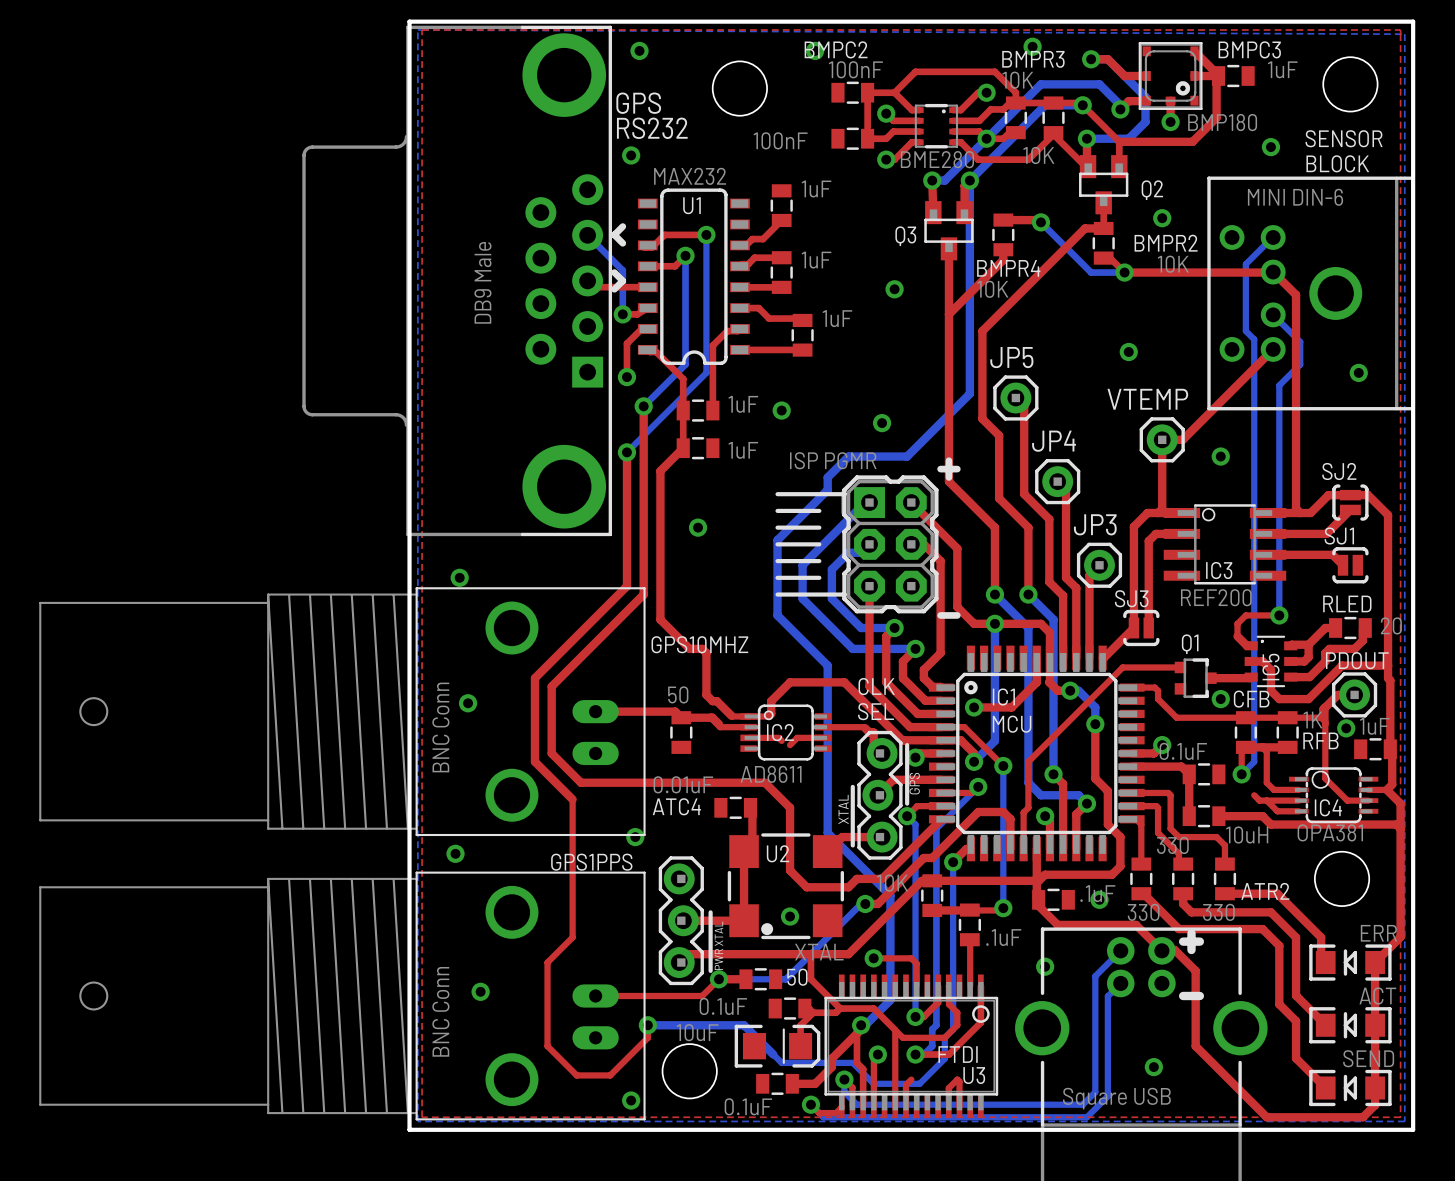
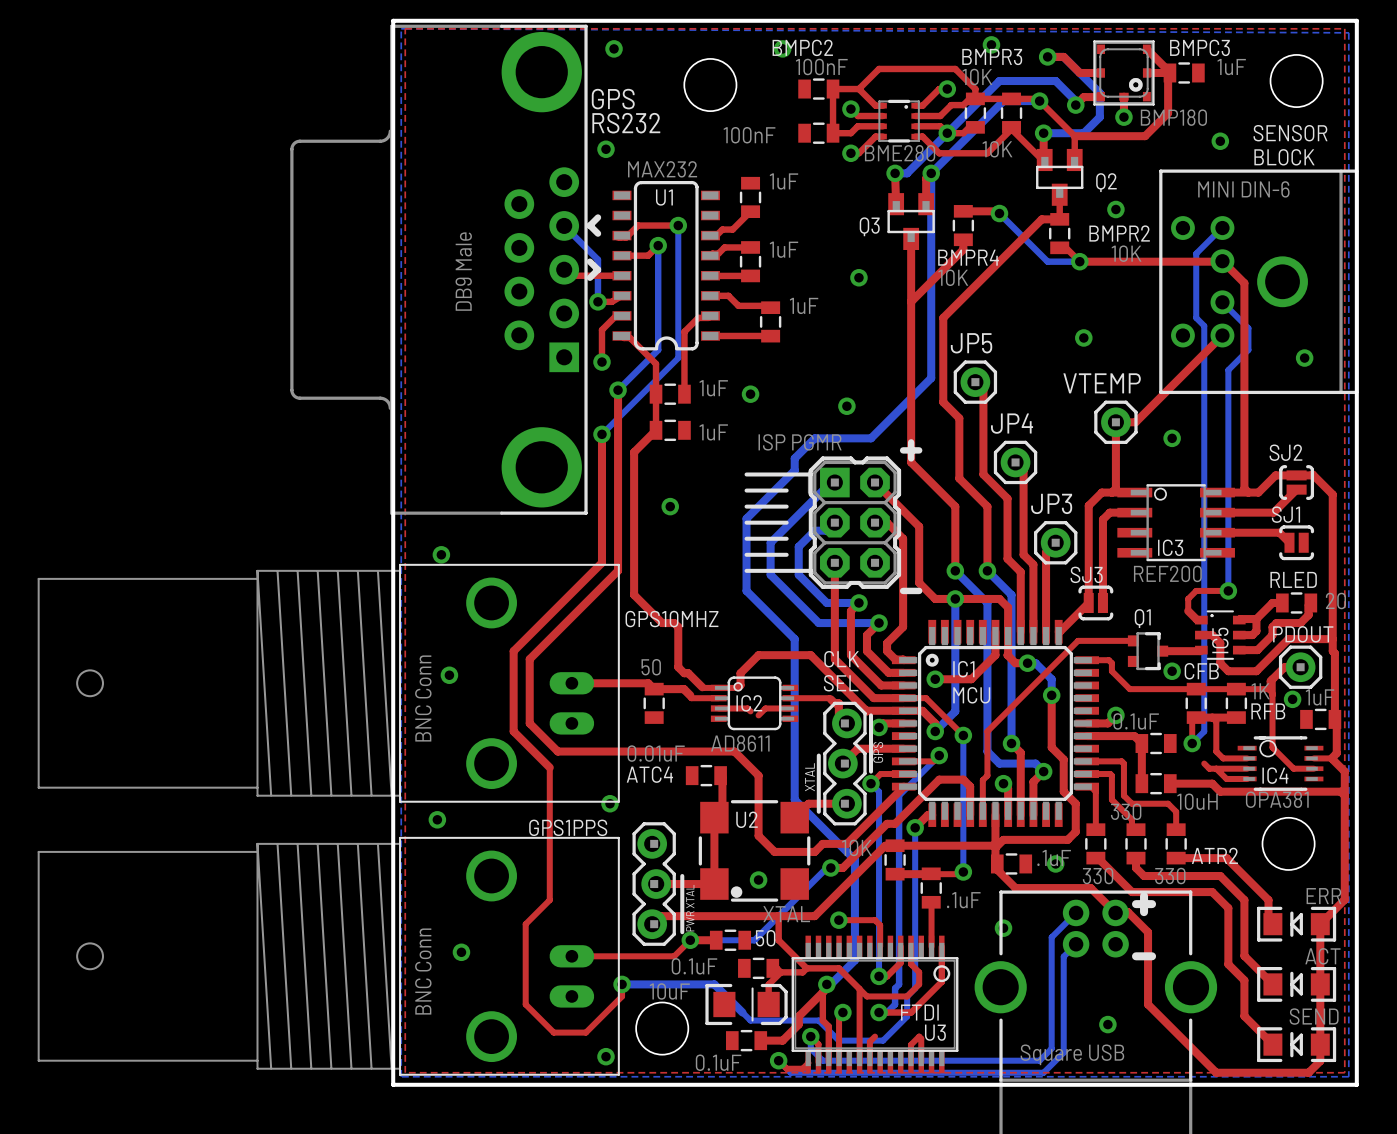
IC4 footprint: [1289, 767, 1379, 824] -> [1237, 736, 1324, 791]

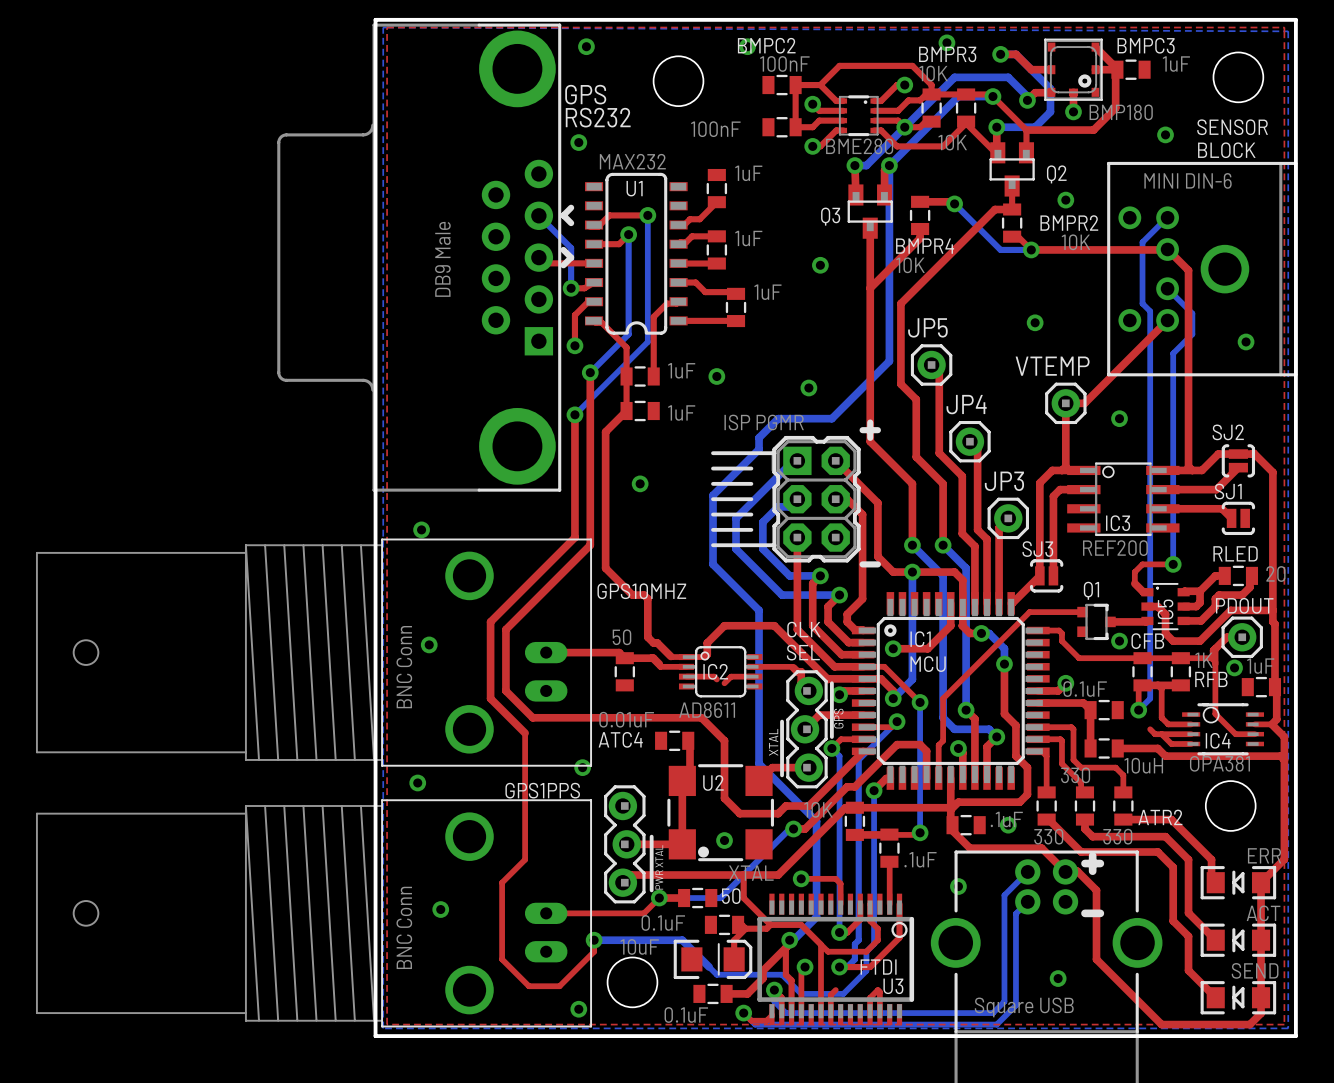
U3 footprint: [791, 935, 959, 1074] -> [757, 893, 915, 1026]

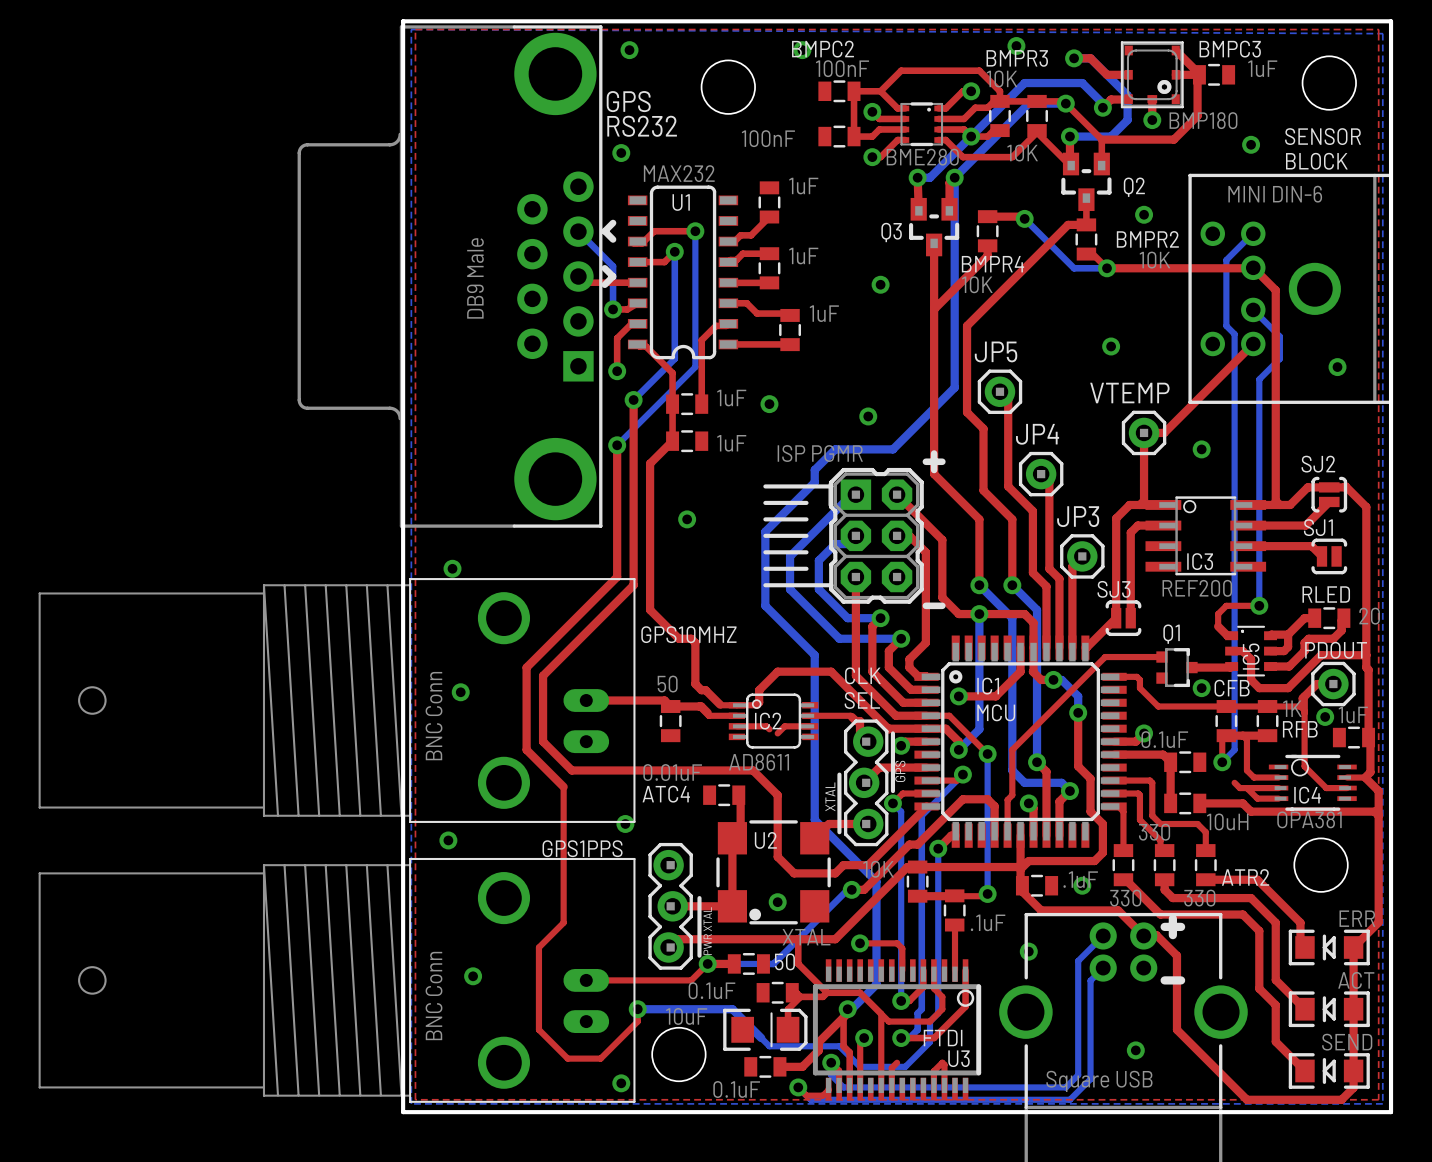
Q2 footprint: [989, 142, 1035, 197] -> [1061, 152, 1112, 212]
Q3 footprint: [847, 184, 893, 239] -> [909, 197, 960, 257]

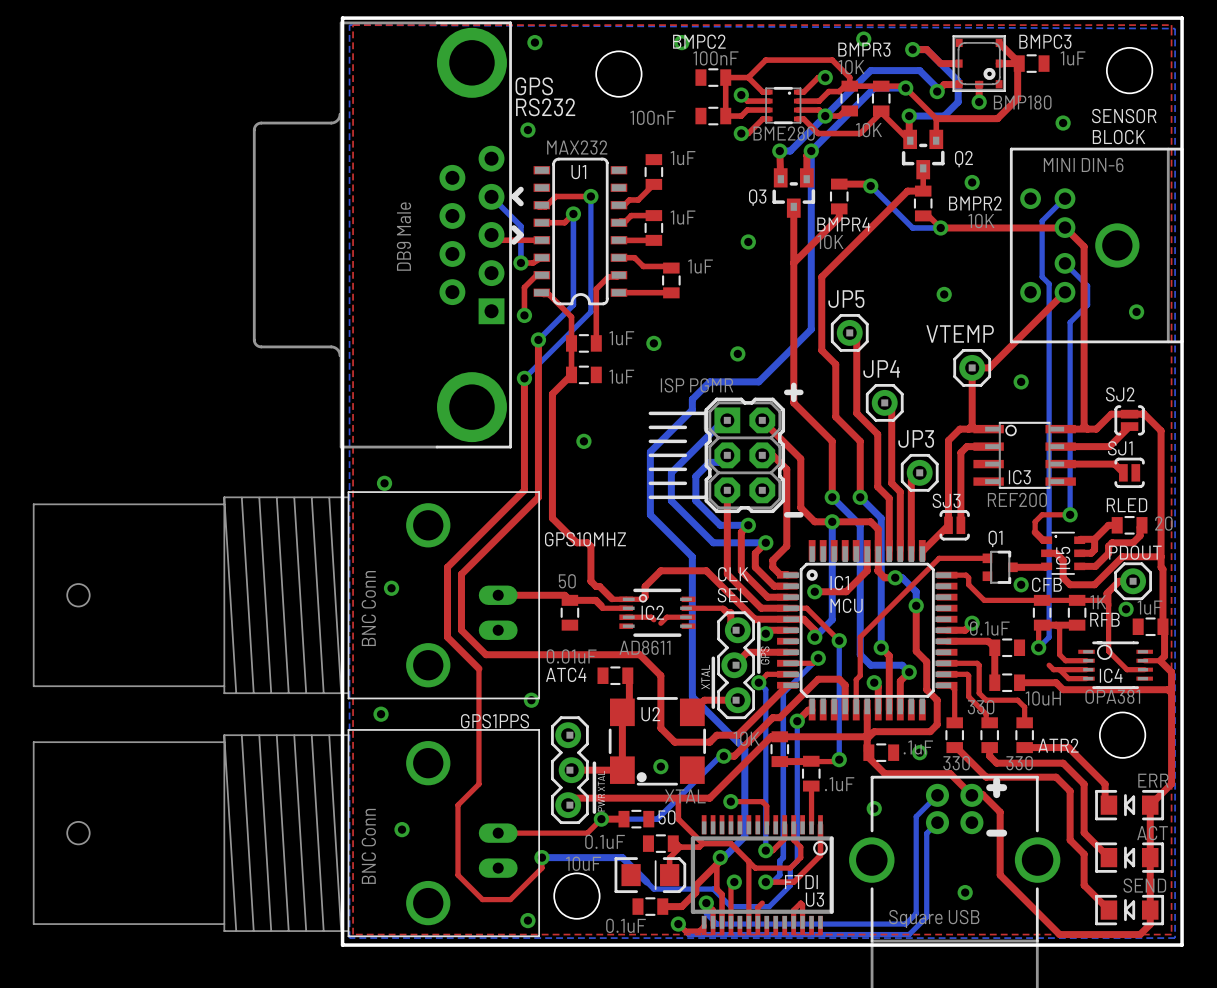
IC2 footprint: [728, 693, 819, 749] -> [619, 588, 696, 637]

